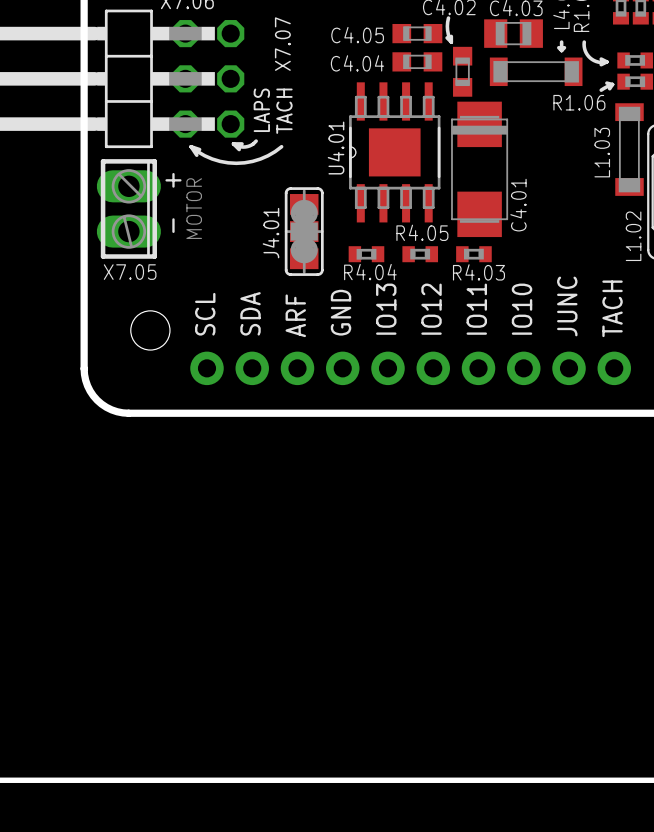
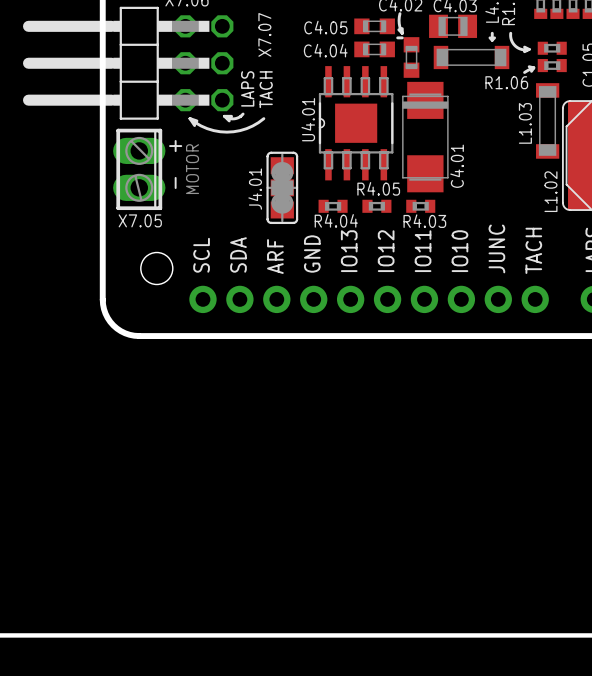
line: none -> (397, 37) (402, 37)

